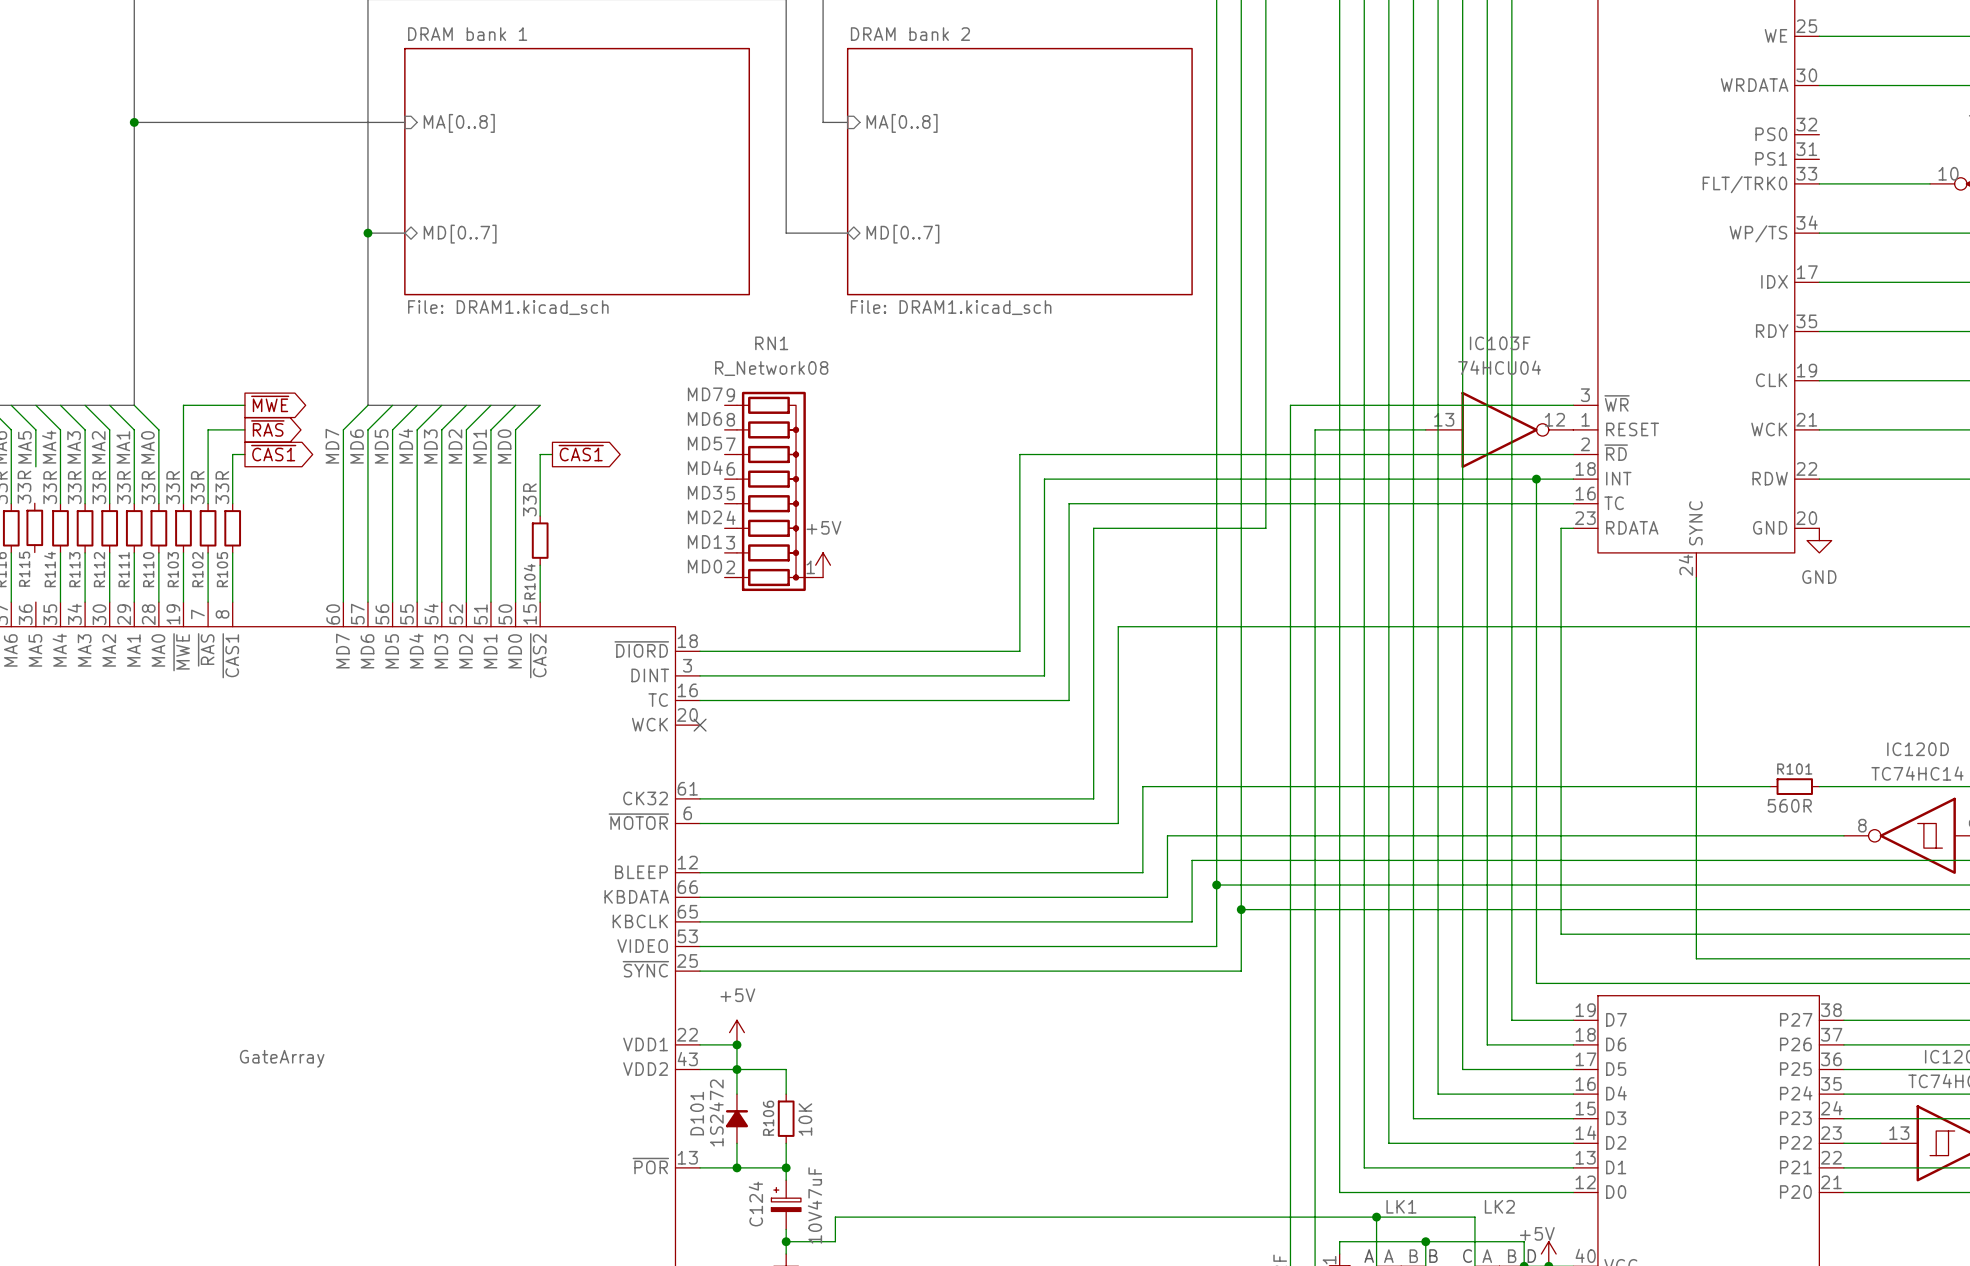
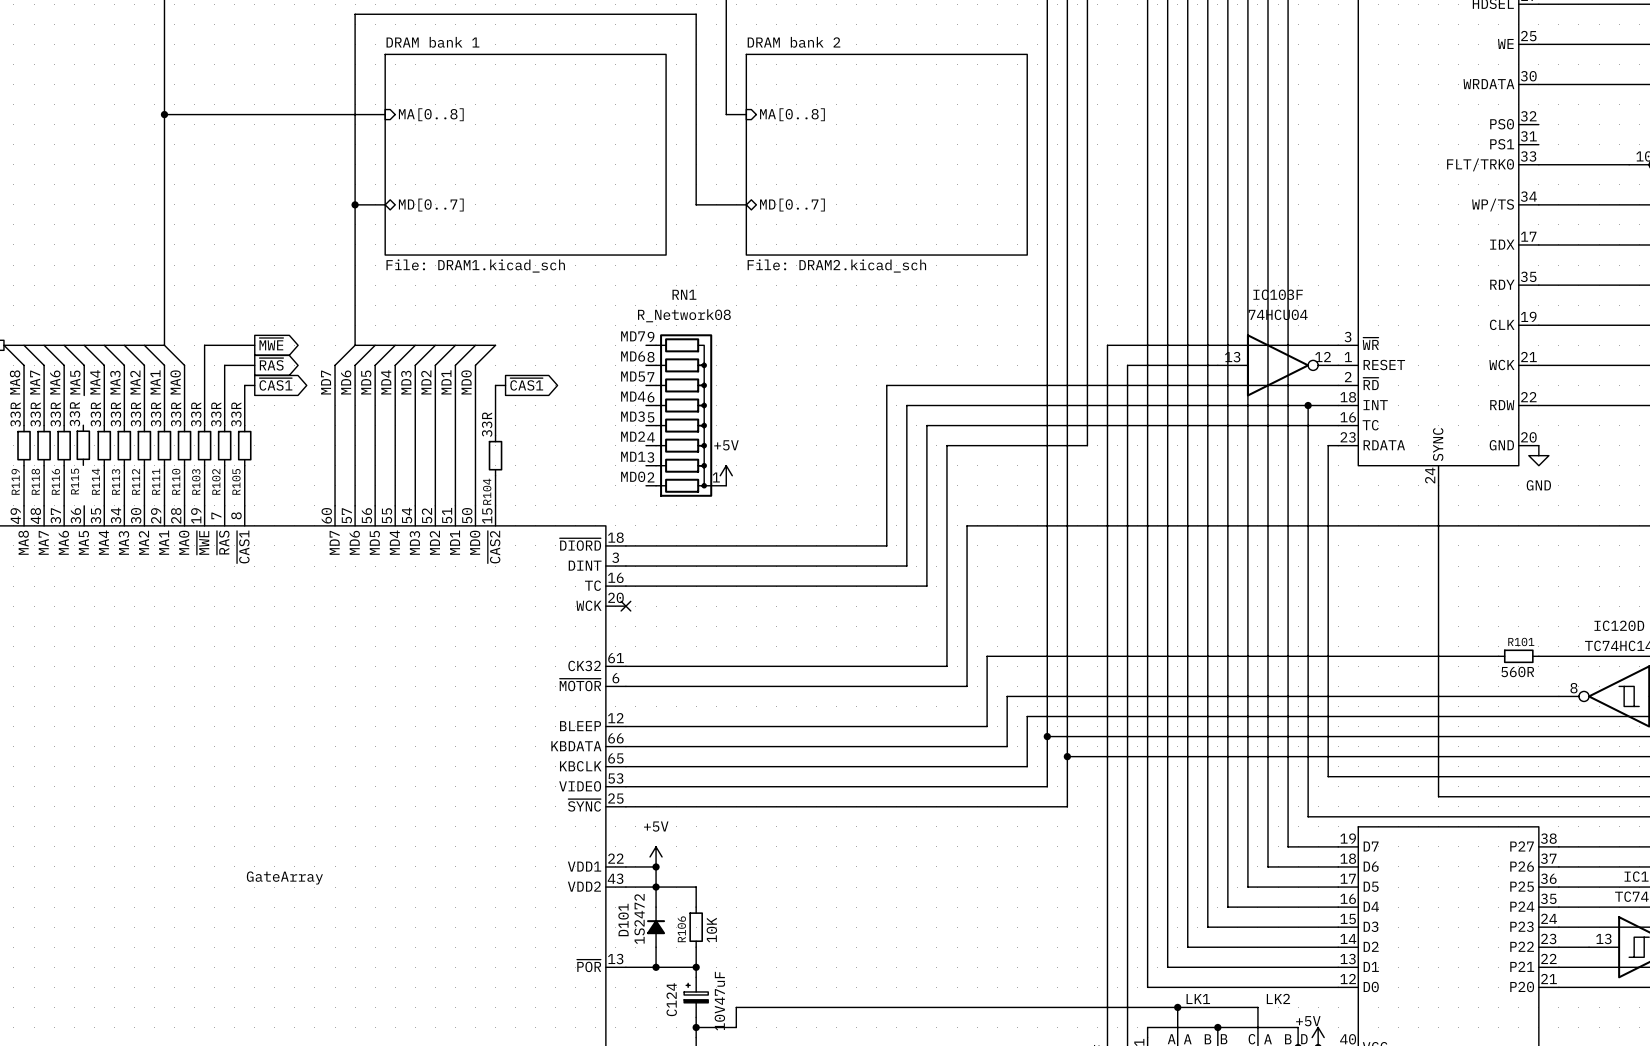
sheet DRAM bank 2 value: File: DRAM1.kicad_sch (951, 307) -> File: DRAM2.kicad_sch (836, 265)

